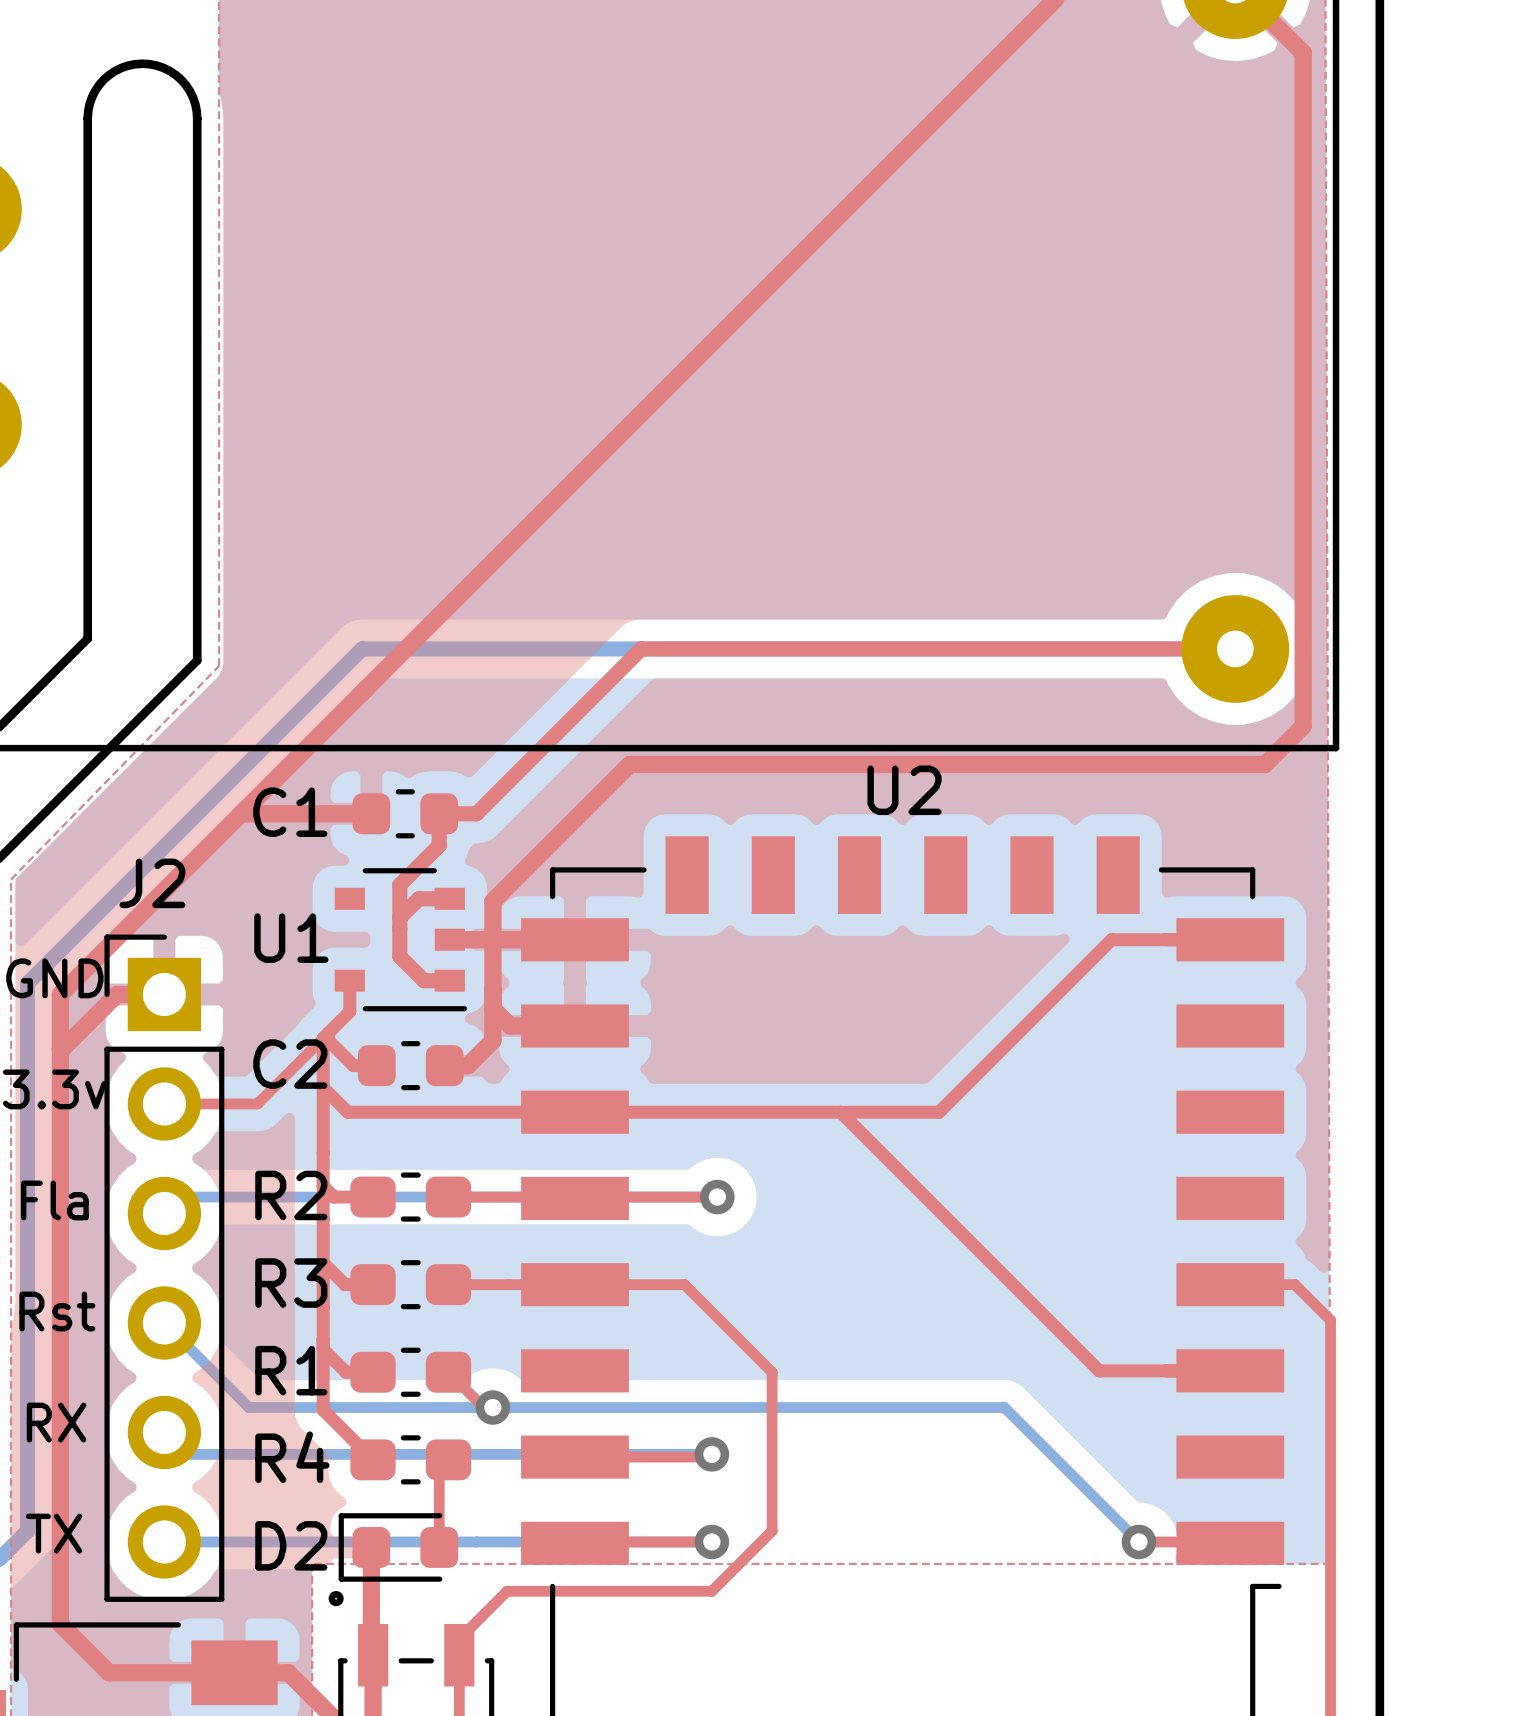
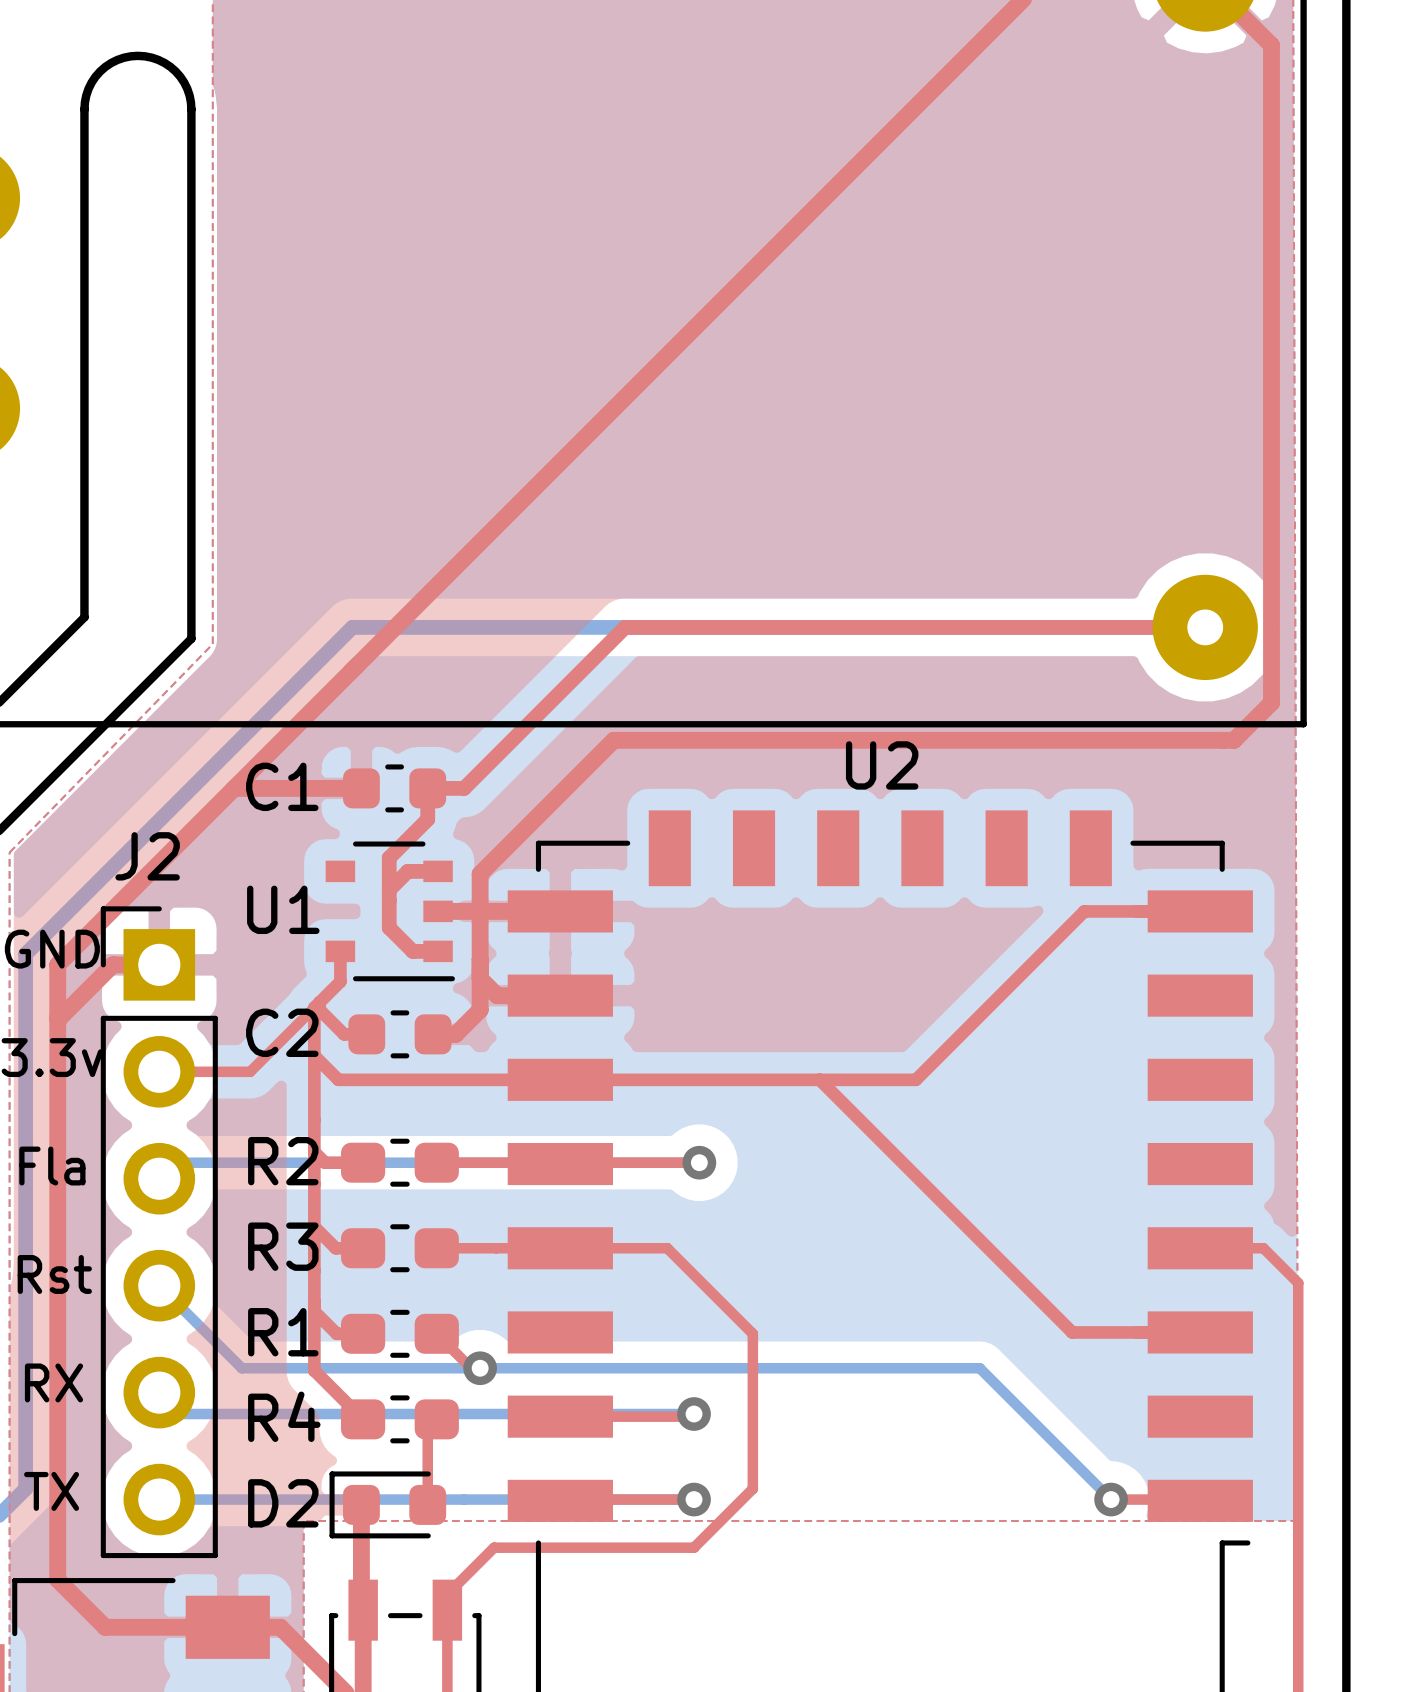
drawing: [328, 1591, 344, 1607] -> none

